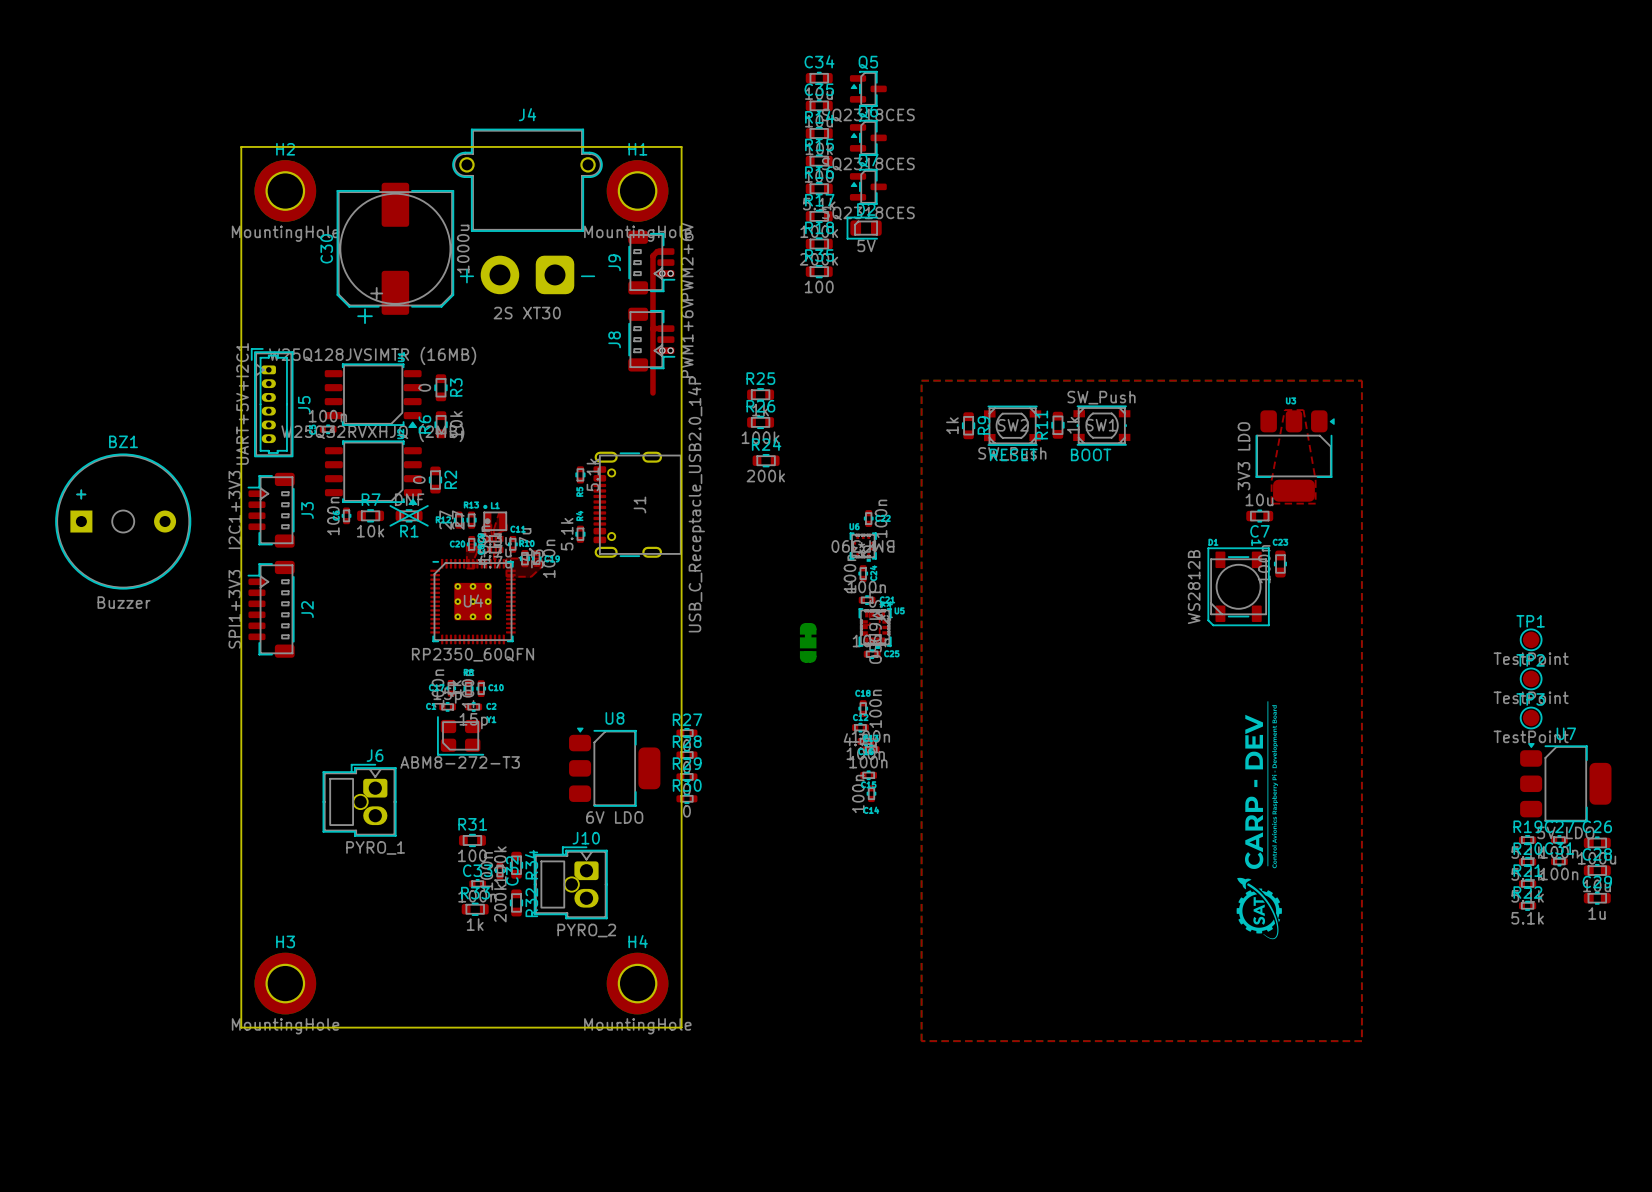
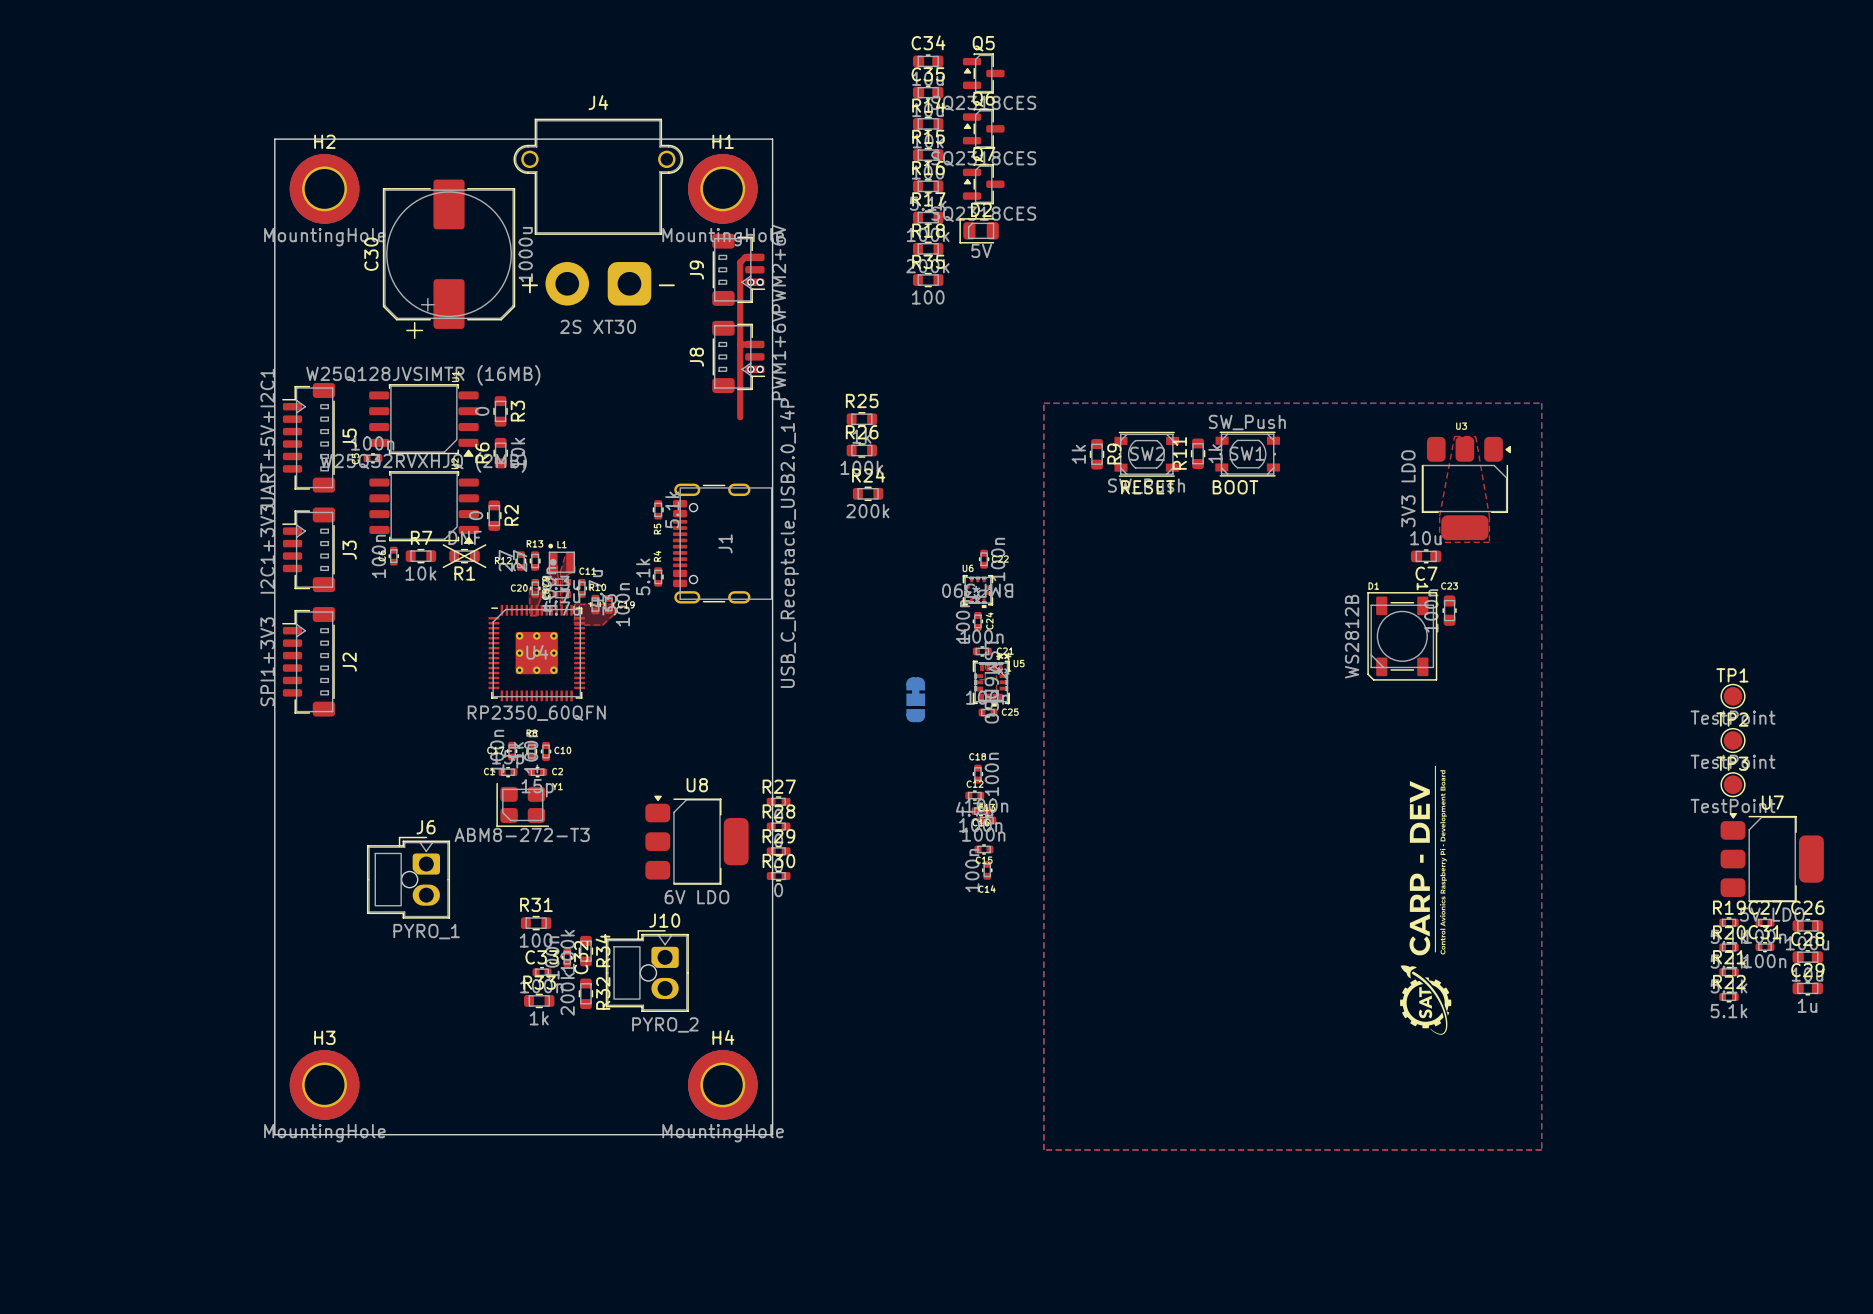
J5 footprint: [251, 348, 294, 458] -> [282, 383, 336, 493]
BZ1: Buzzer (123, 521) -> none

